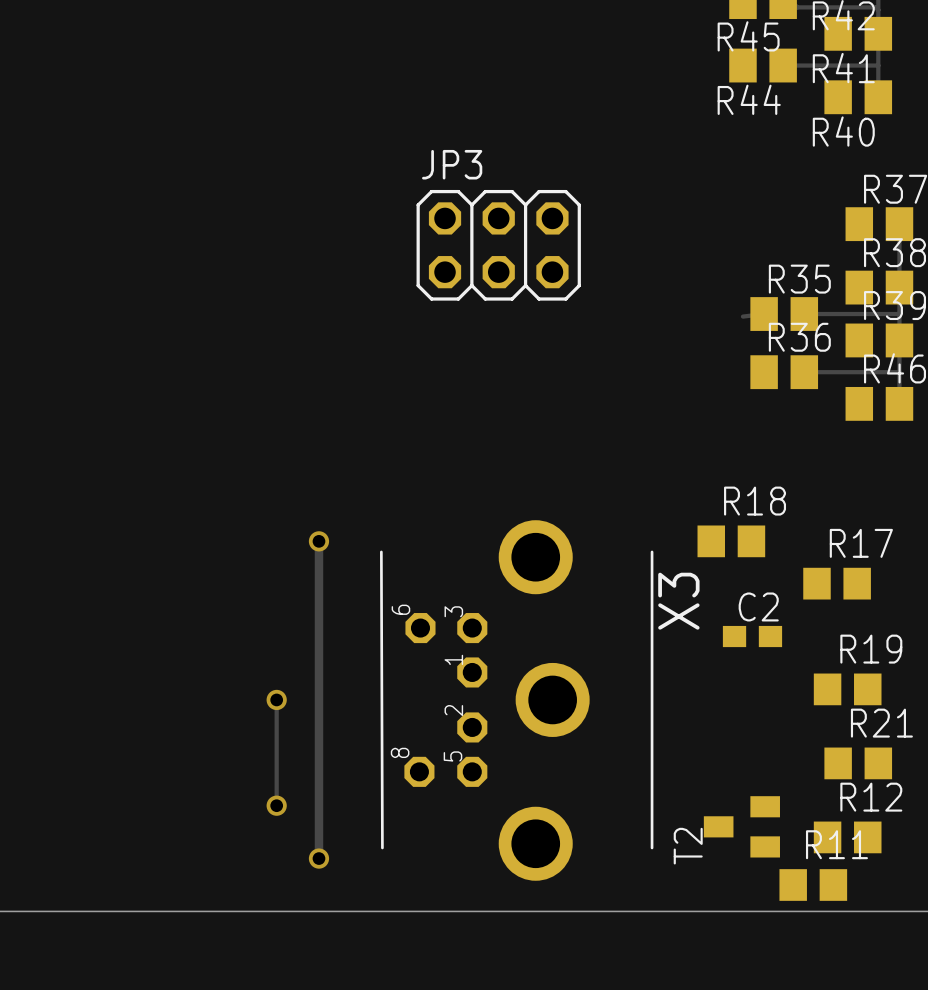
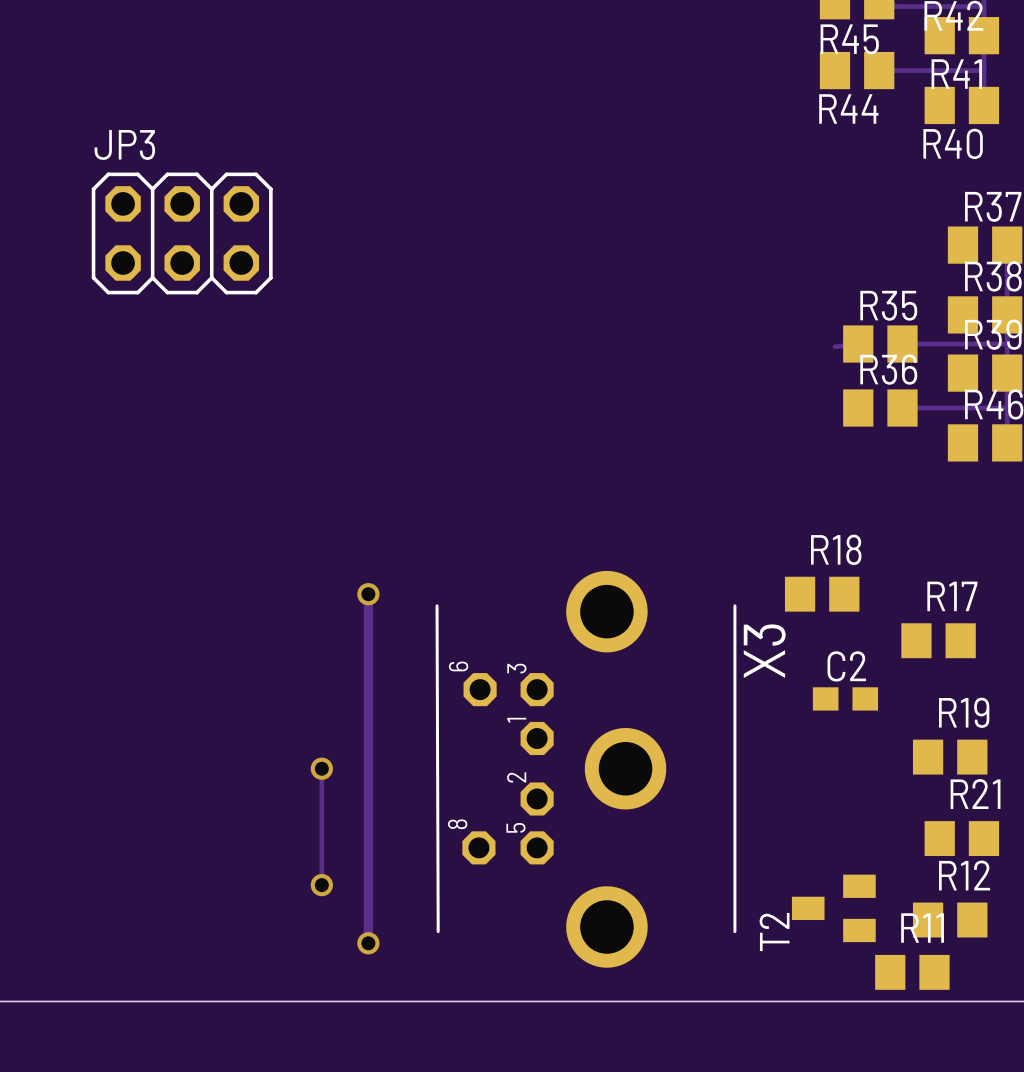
JP3 position: (498, 245) -> (182, 233)

